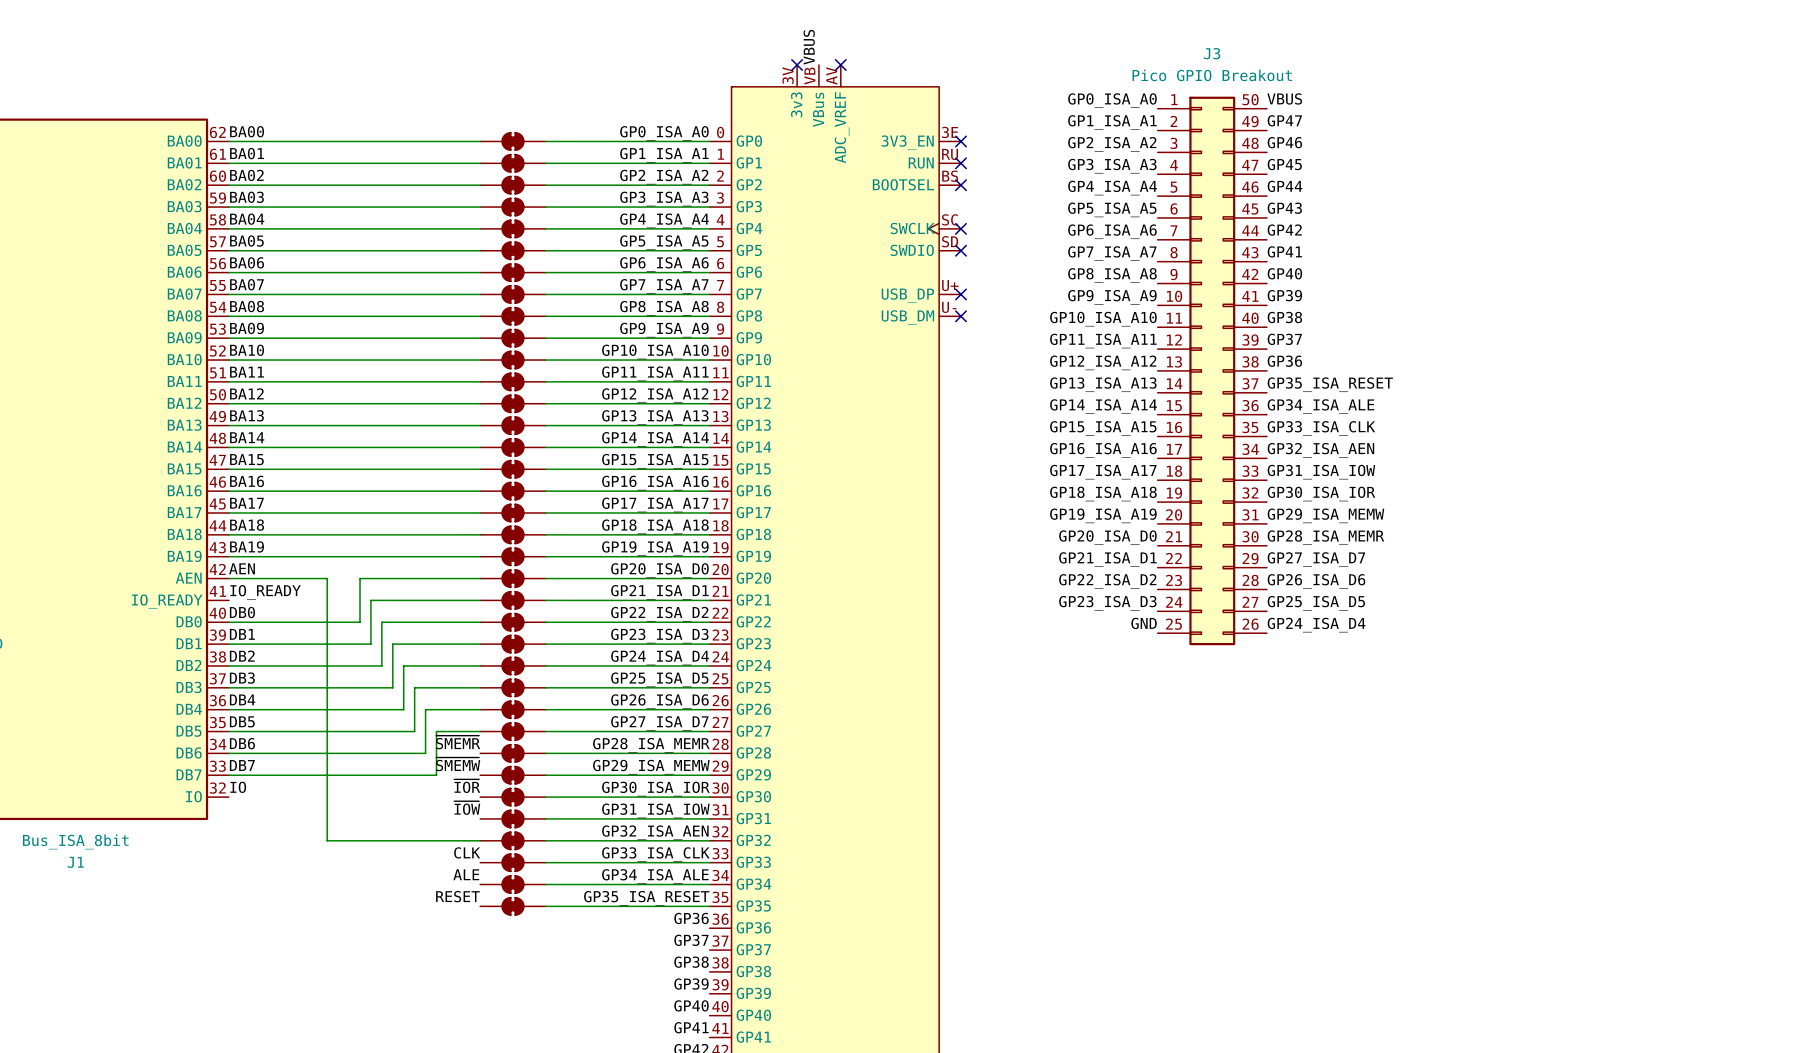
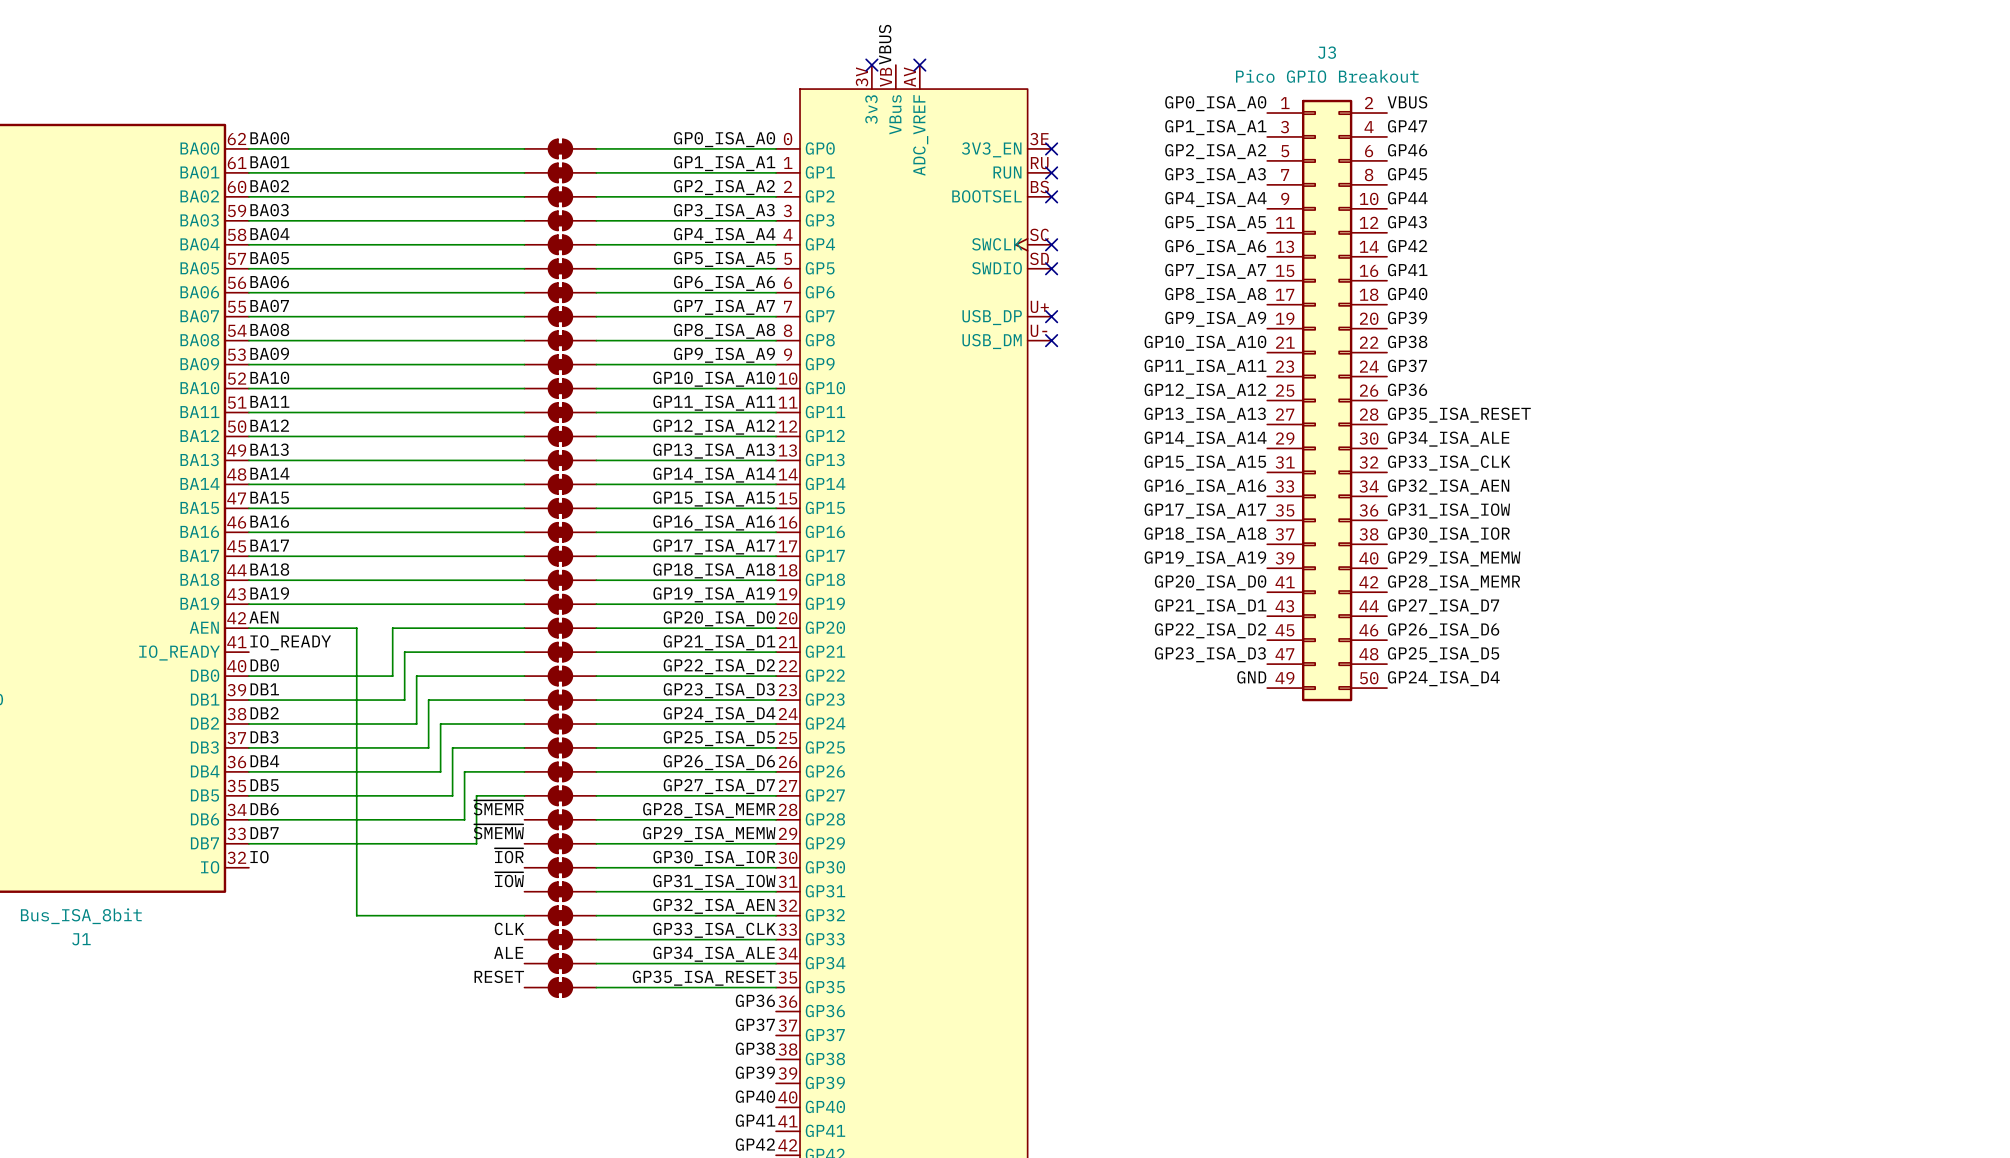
J3 symbol: [1157, 96, 1267, 646] -> [1267, 99, 1388, 702]

